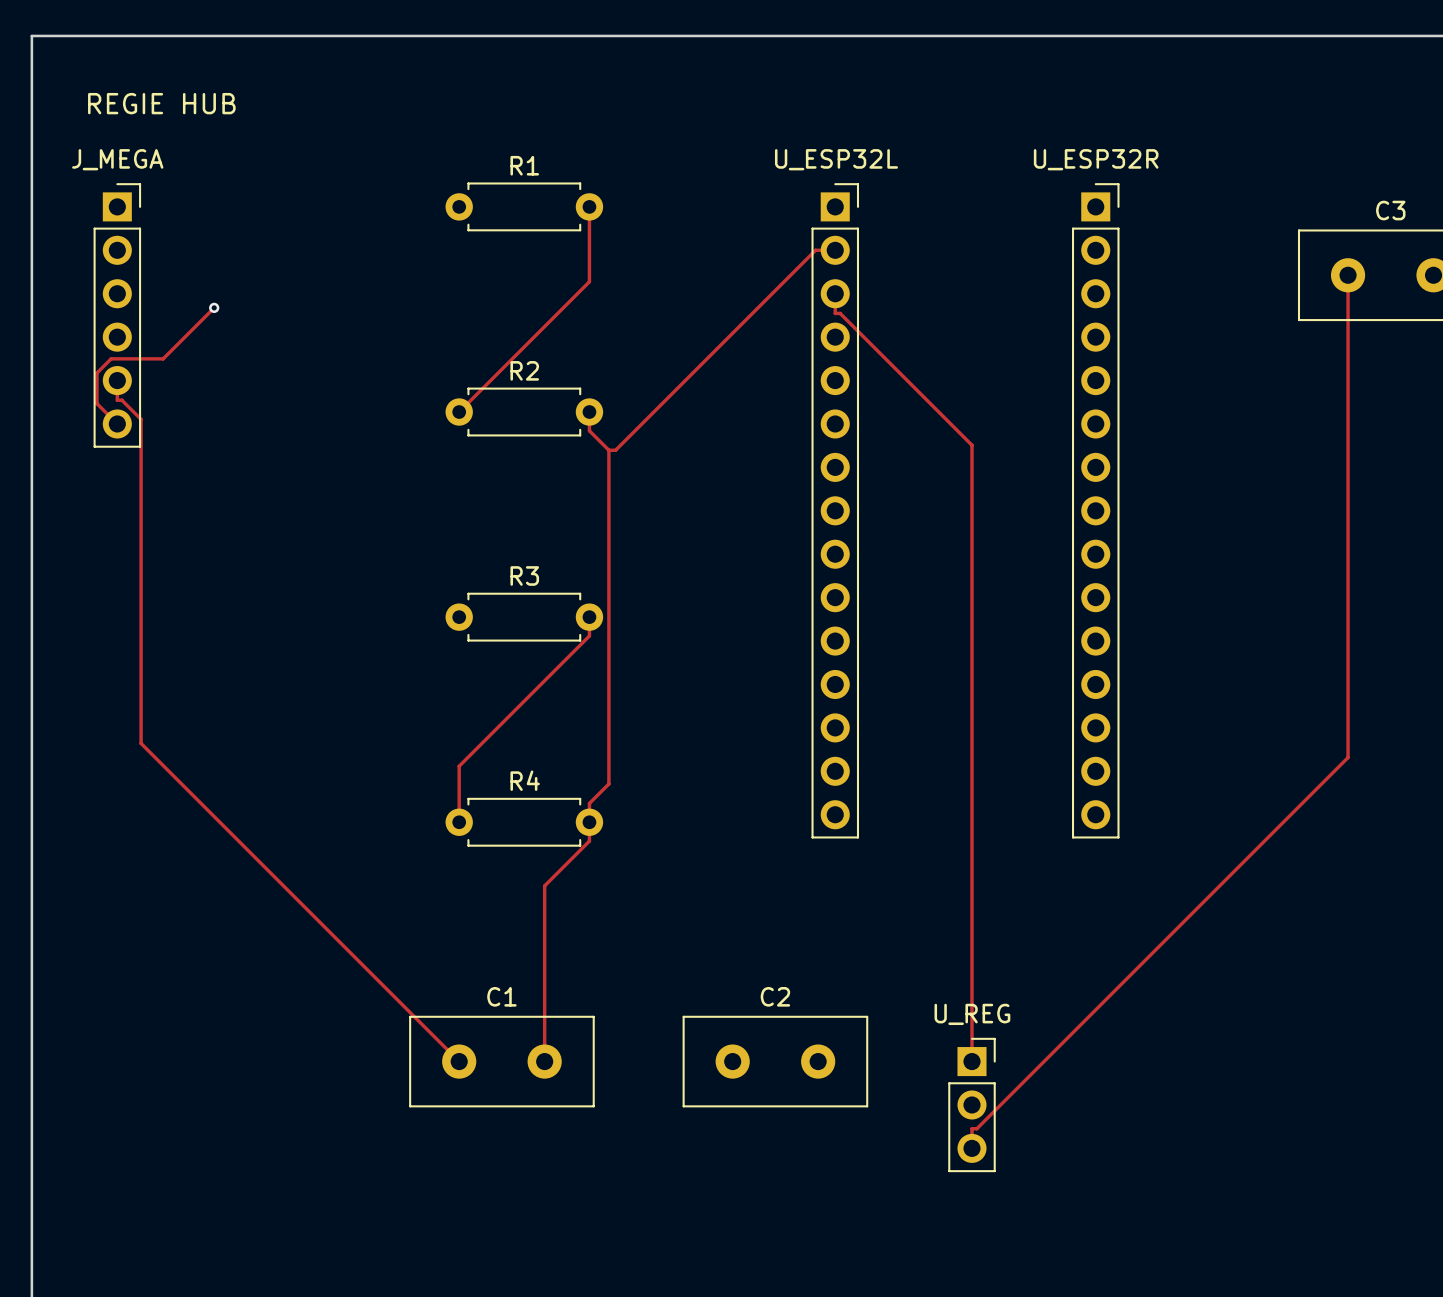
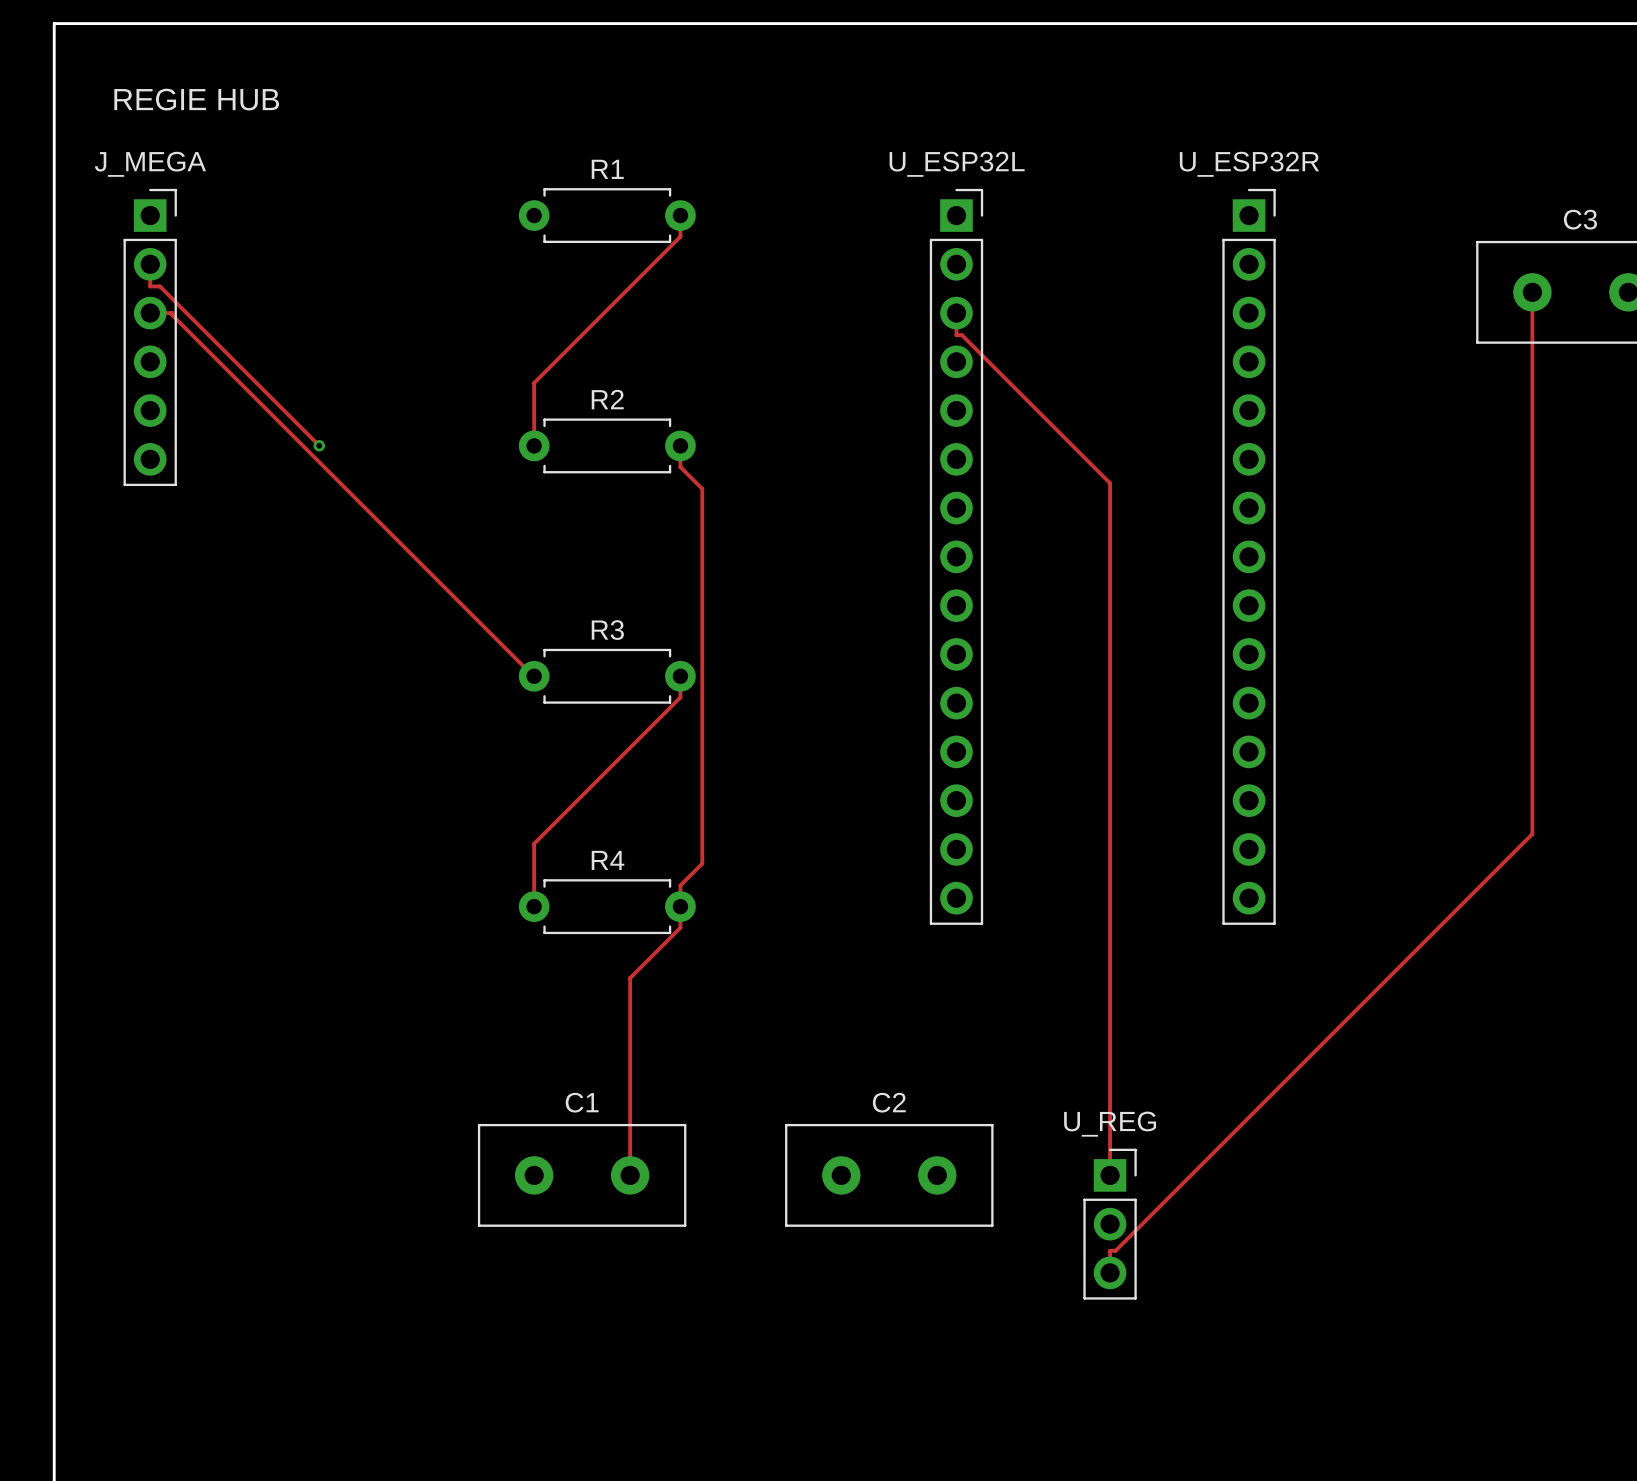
track: (589, 225) (589, 281) (459, 412) -> (680, 236) (534, 382) (534, 445)
track: none -> (150, 264) (150, 286) (159, 286) (319, 445)
track: (835, 250) (815, 250) (615, 450) (608, 450) -> none
track: none -> (150, 313) (172, 313) (534, 676)
track: (214, 307) (163, 358) (111, 358) (96, 373) (96, 403) (117, 423) -> none
via: (214, 307) -> none
track: (117, 380) (117, 400) (121, 400) (141, 419) (141, 743) (459, 1061) -> none
via: none -> (319, 445)

